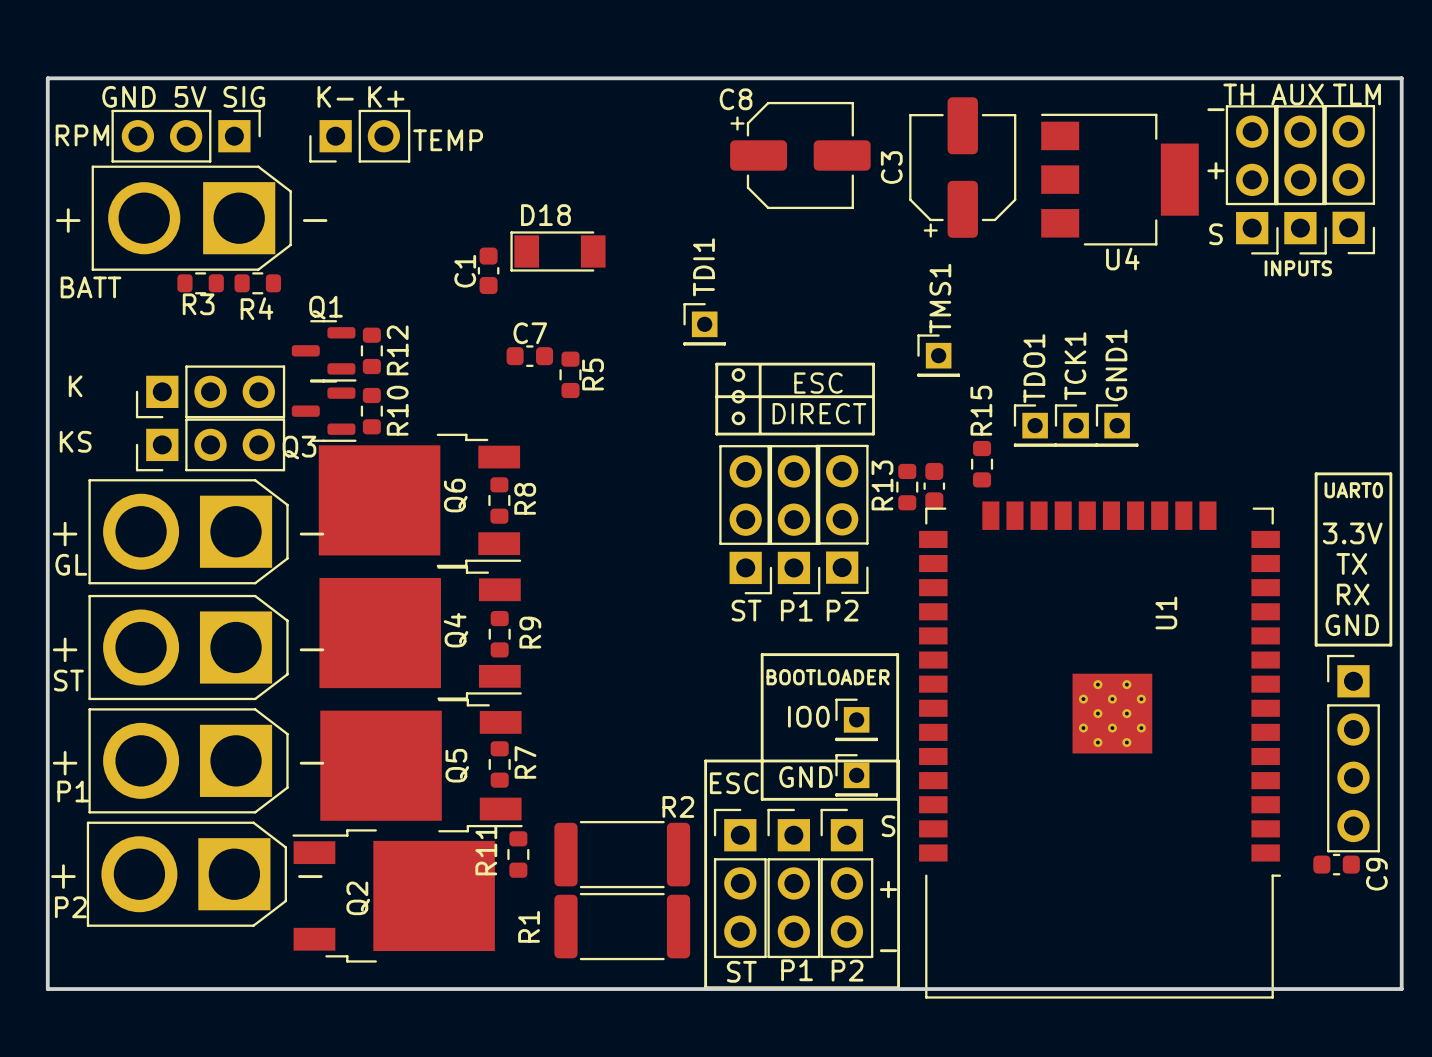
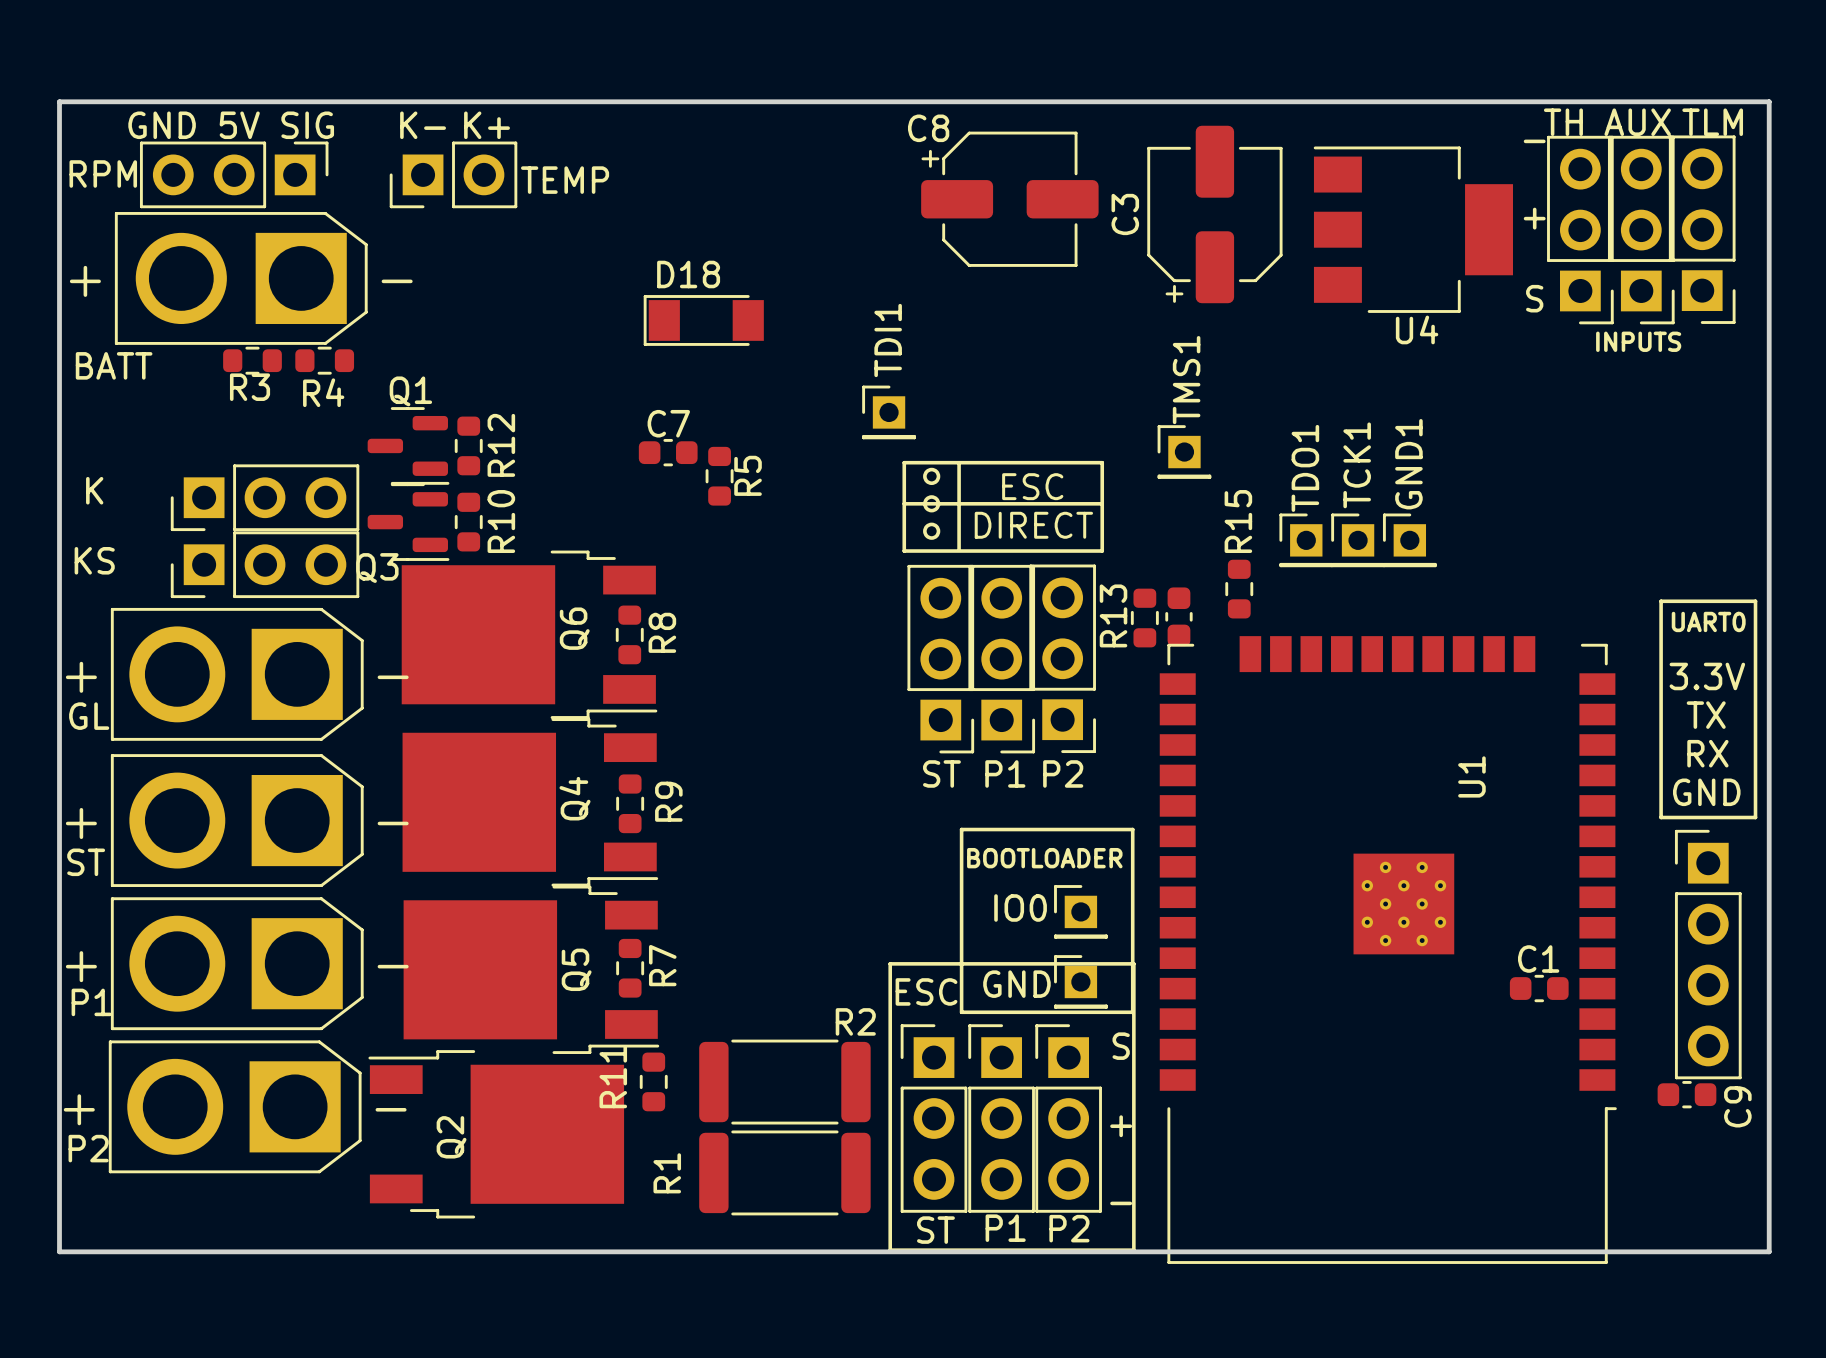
C1 rotation: 0° (488, 270) -> 90° clockwise (1539, 988)
C1 position: (488, 270) -> (1539, 988)

